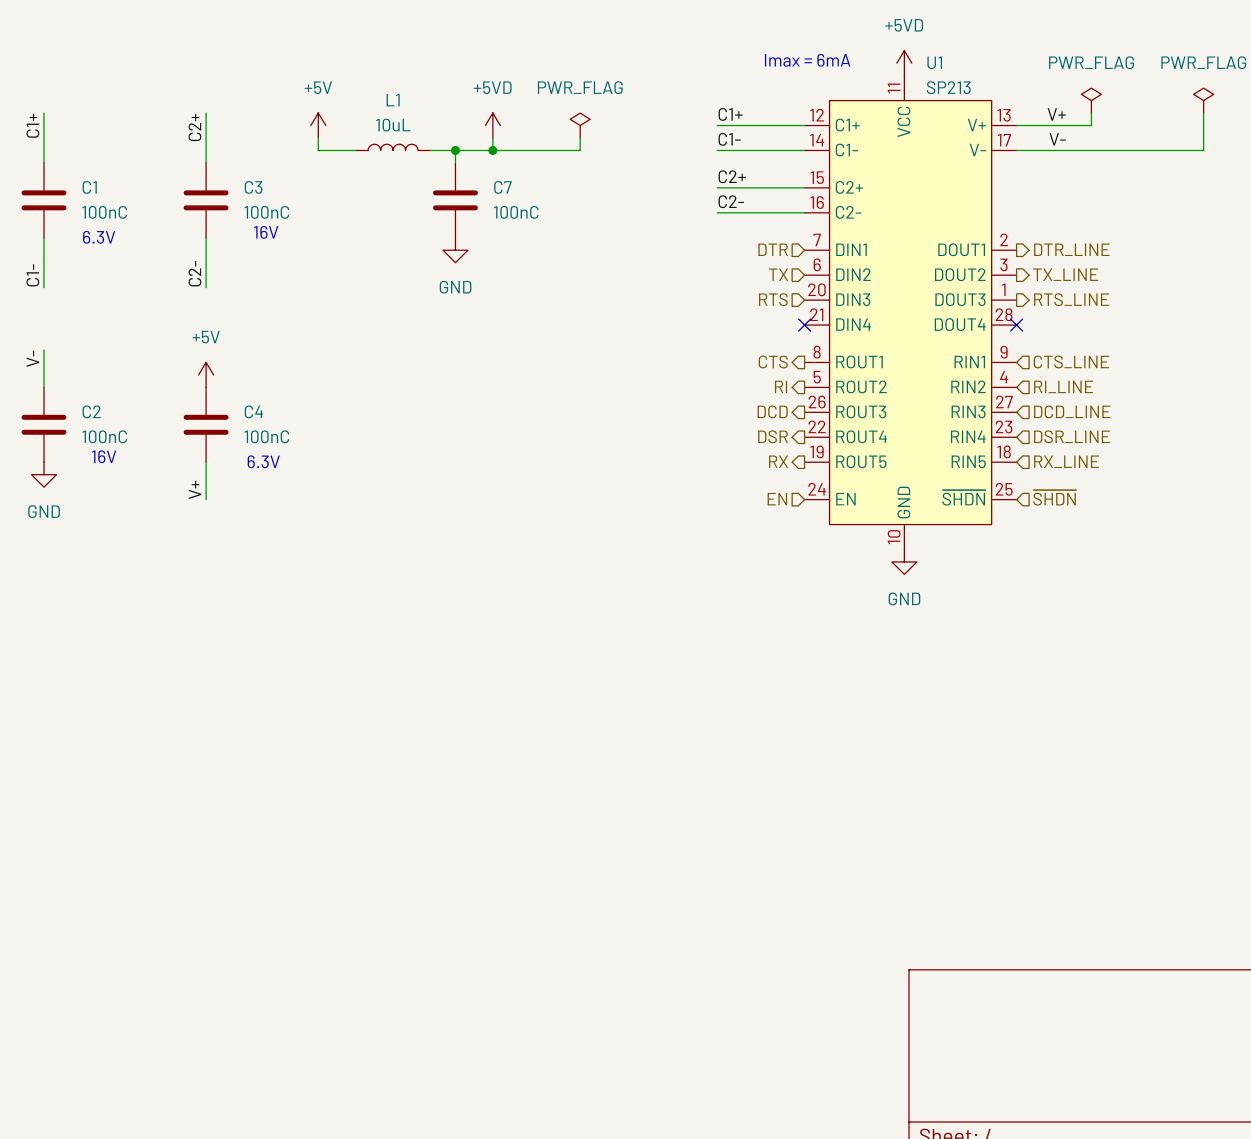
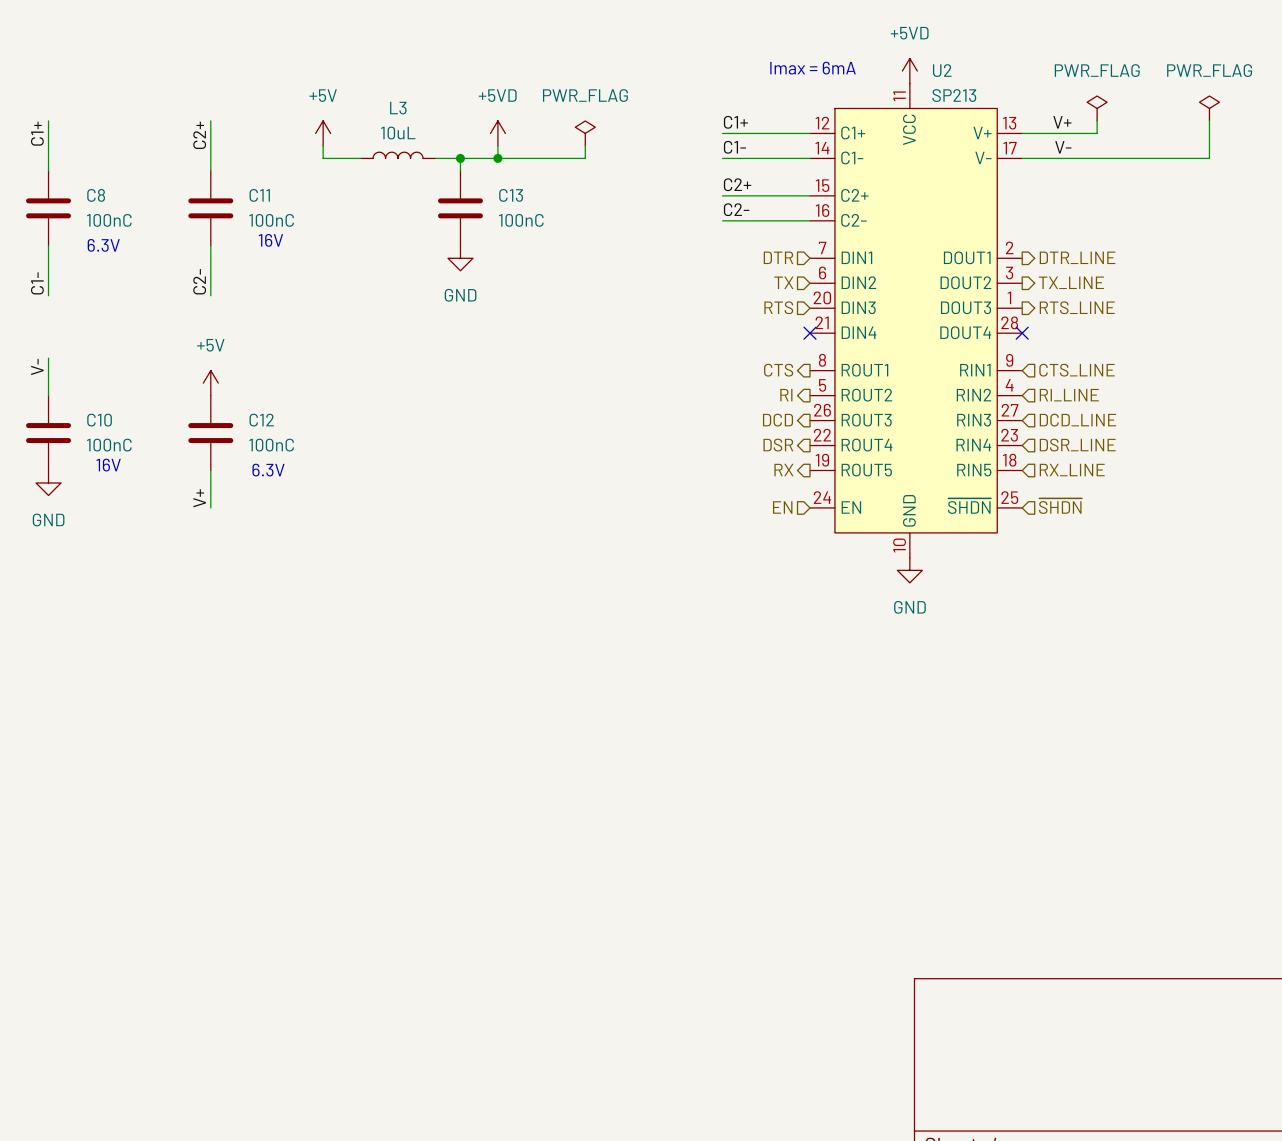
U1 name: U1 (934, 62) -> U2 (942, 70)
L1 name: L1 (393, 100) -> L3 (398, 108)
C1 name: C1 (89, 187) -> C8 (96, 195)
C3 name: C3 (253, 187) -> C11 (259, 195)
C7 name: C7 (502, 187) -> C13 (511, 195)
C2 name: C2 (91, 411) -> C10 (99, 420)
C4 name: C4 (253, 411) -> C12 (261, 420)

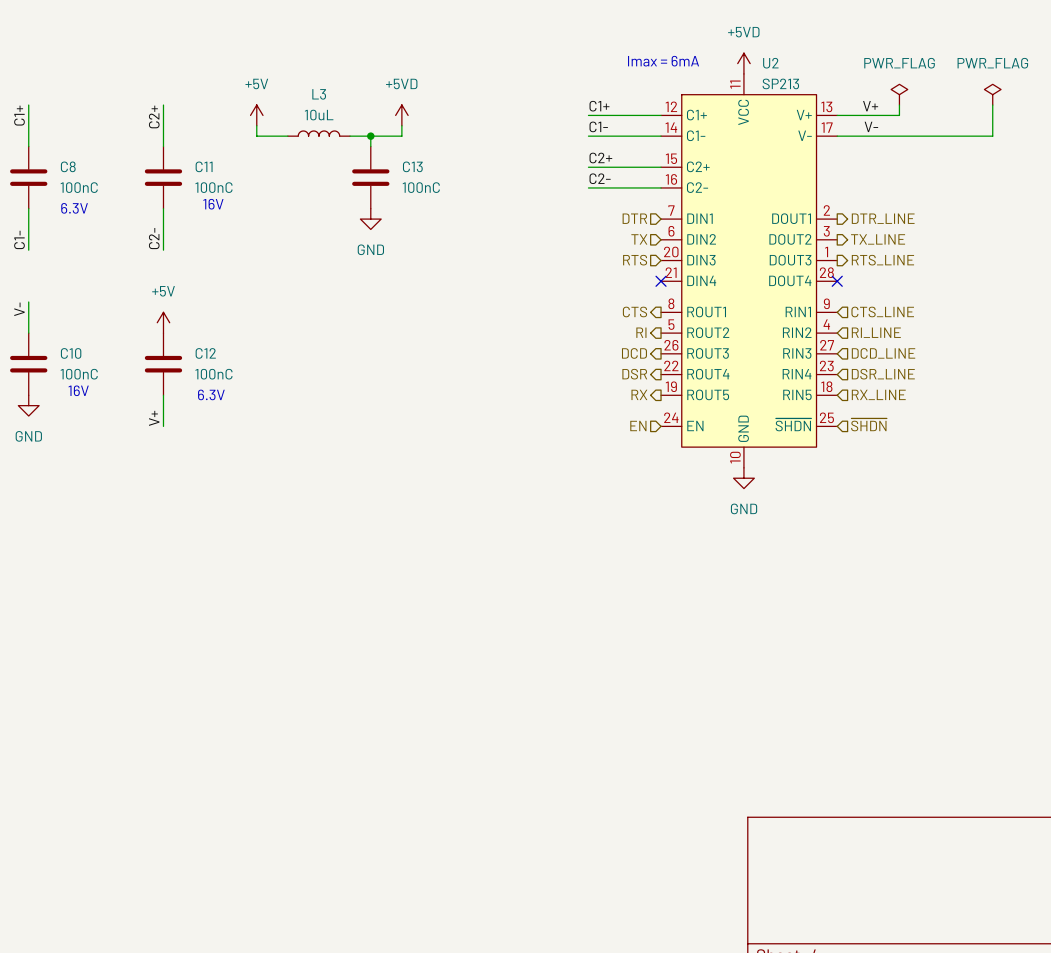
power symbol: PWR_FLAG (585, 133) -> none
wire: (585, 145) (585, 158) (497, 158) -> none
junction: (497, 158) -> none

